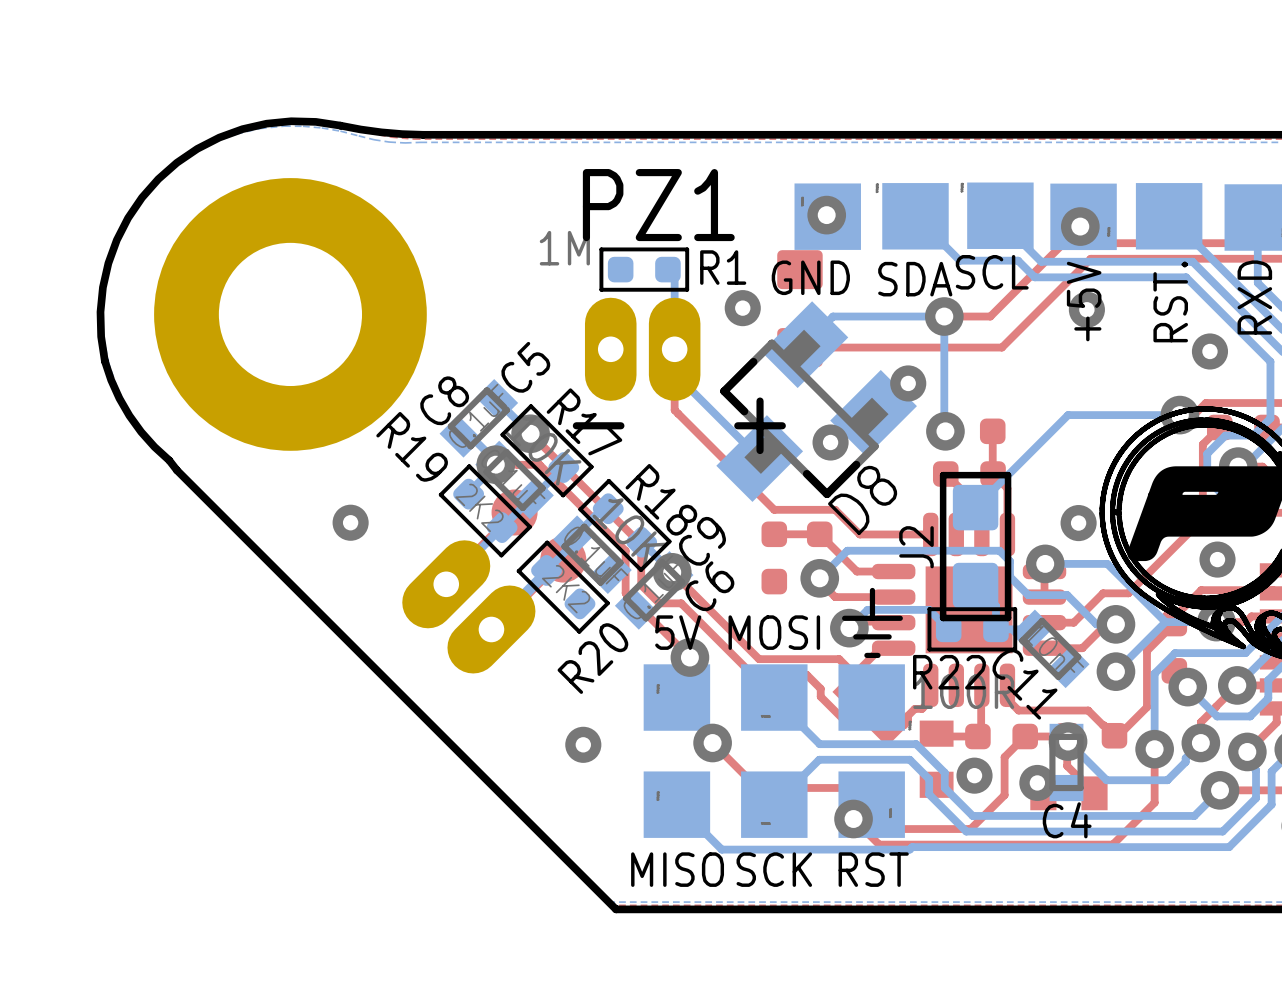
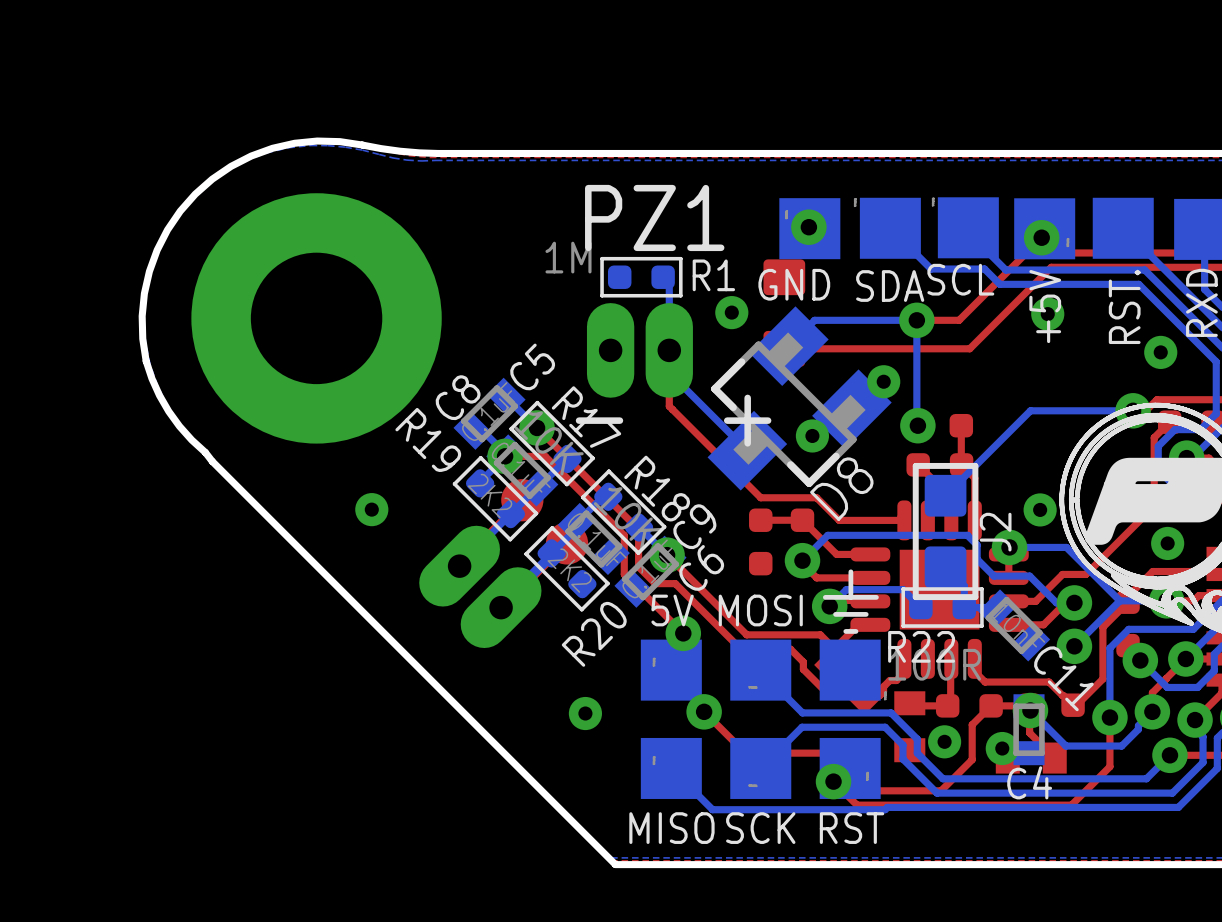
J2 name position: J2 (916, 547) -> J2 (995, 532)
C11 name position: C11 (1024, 684) -> C11 (1063, 678)

